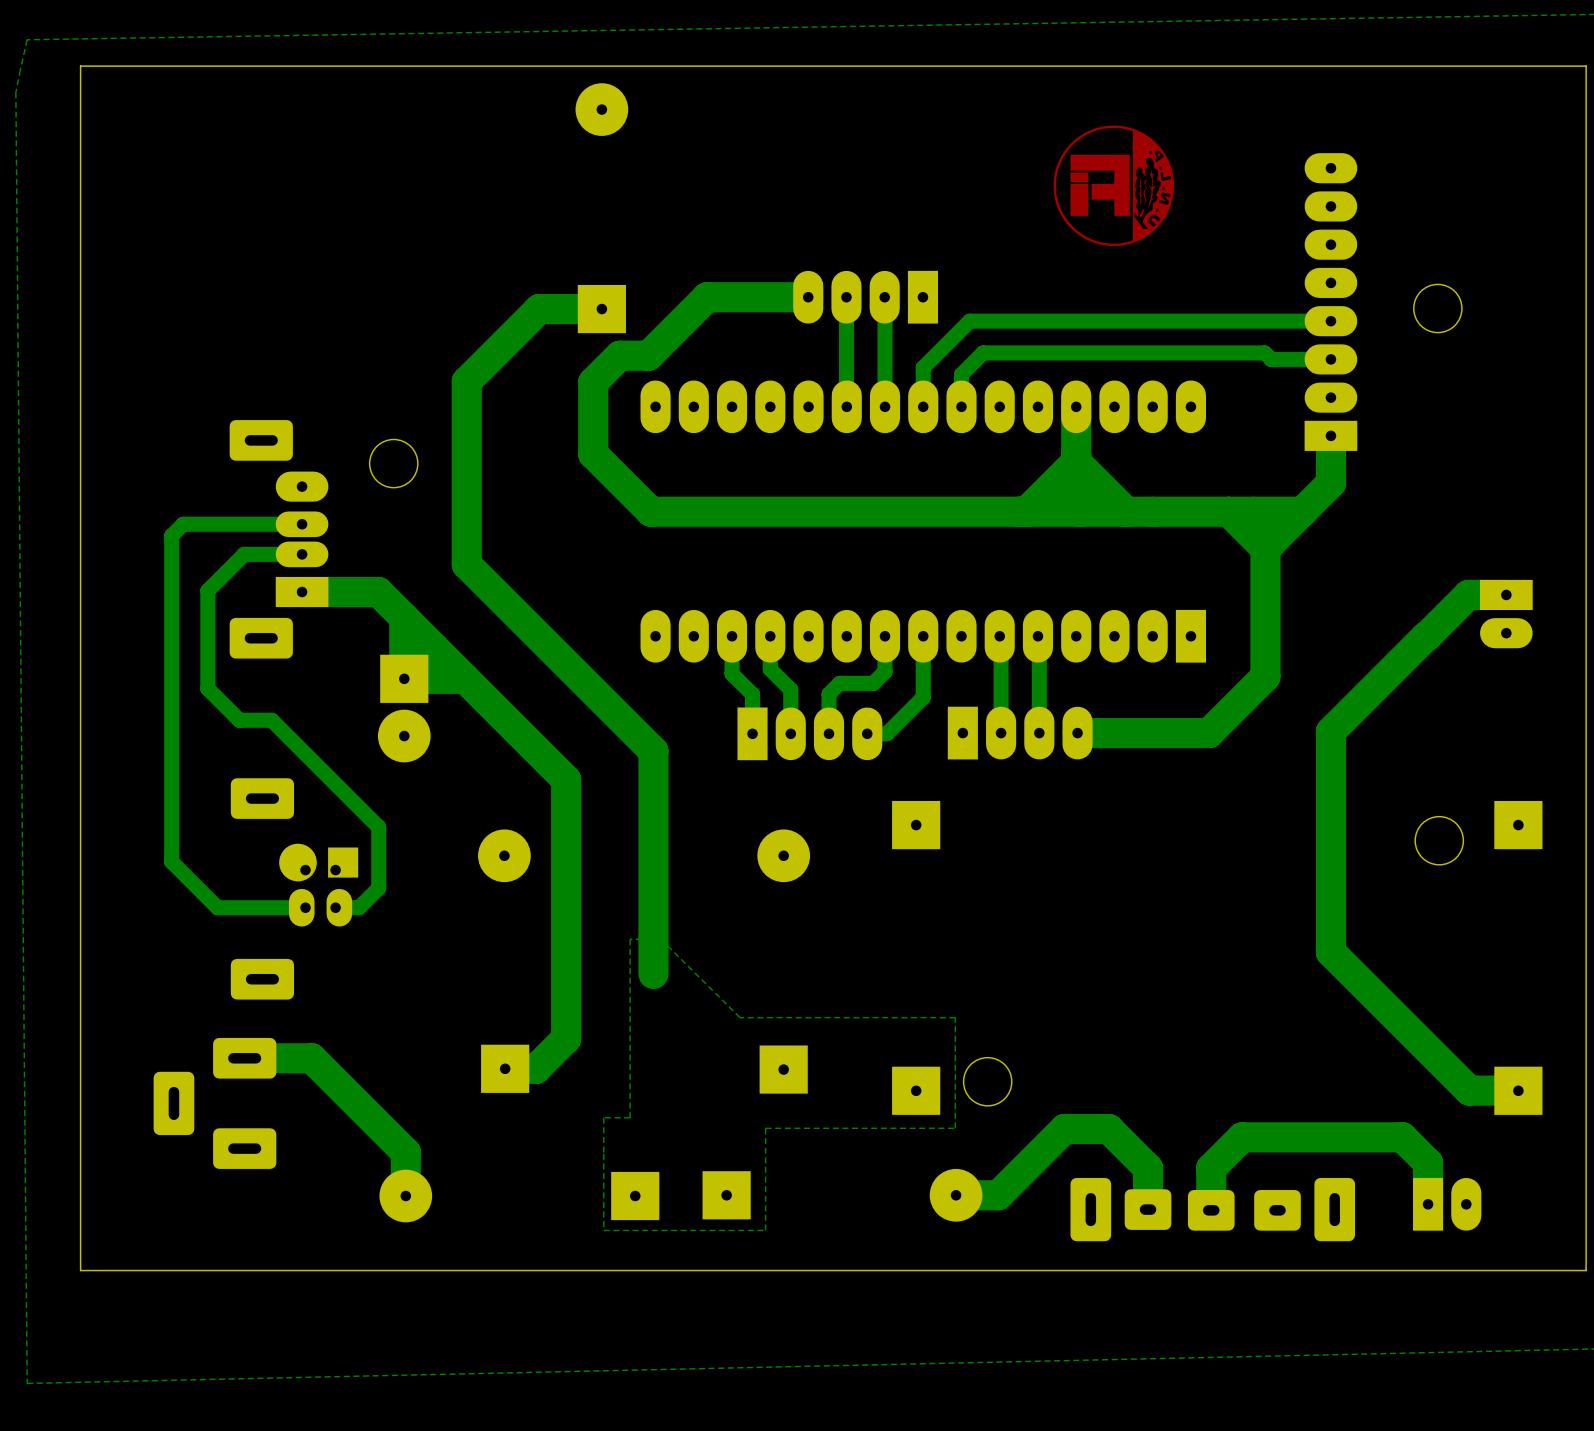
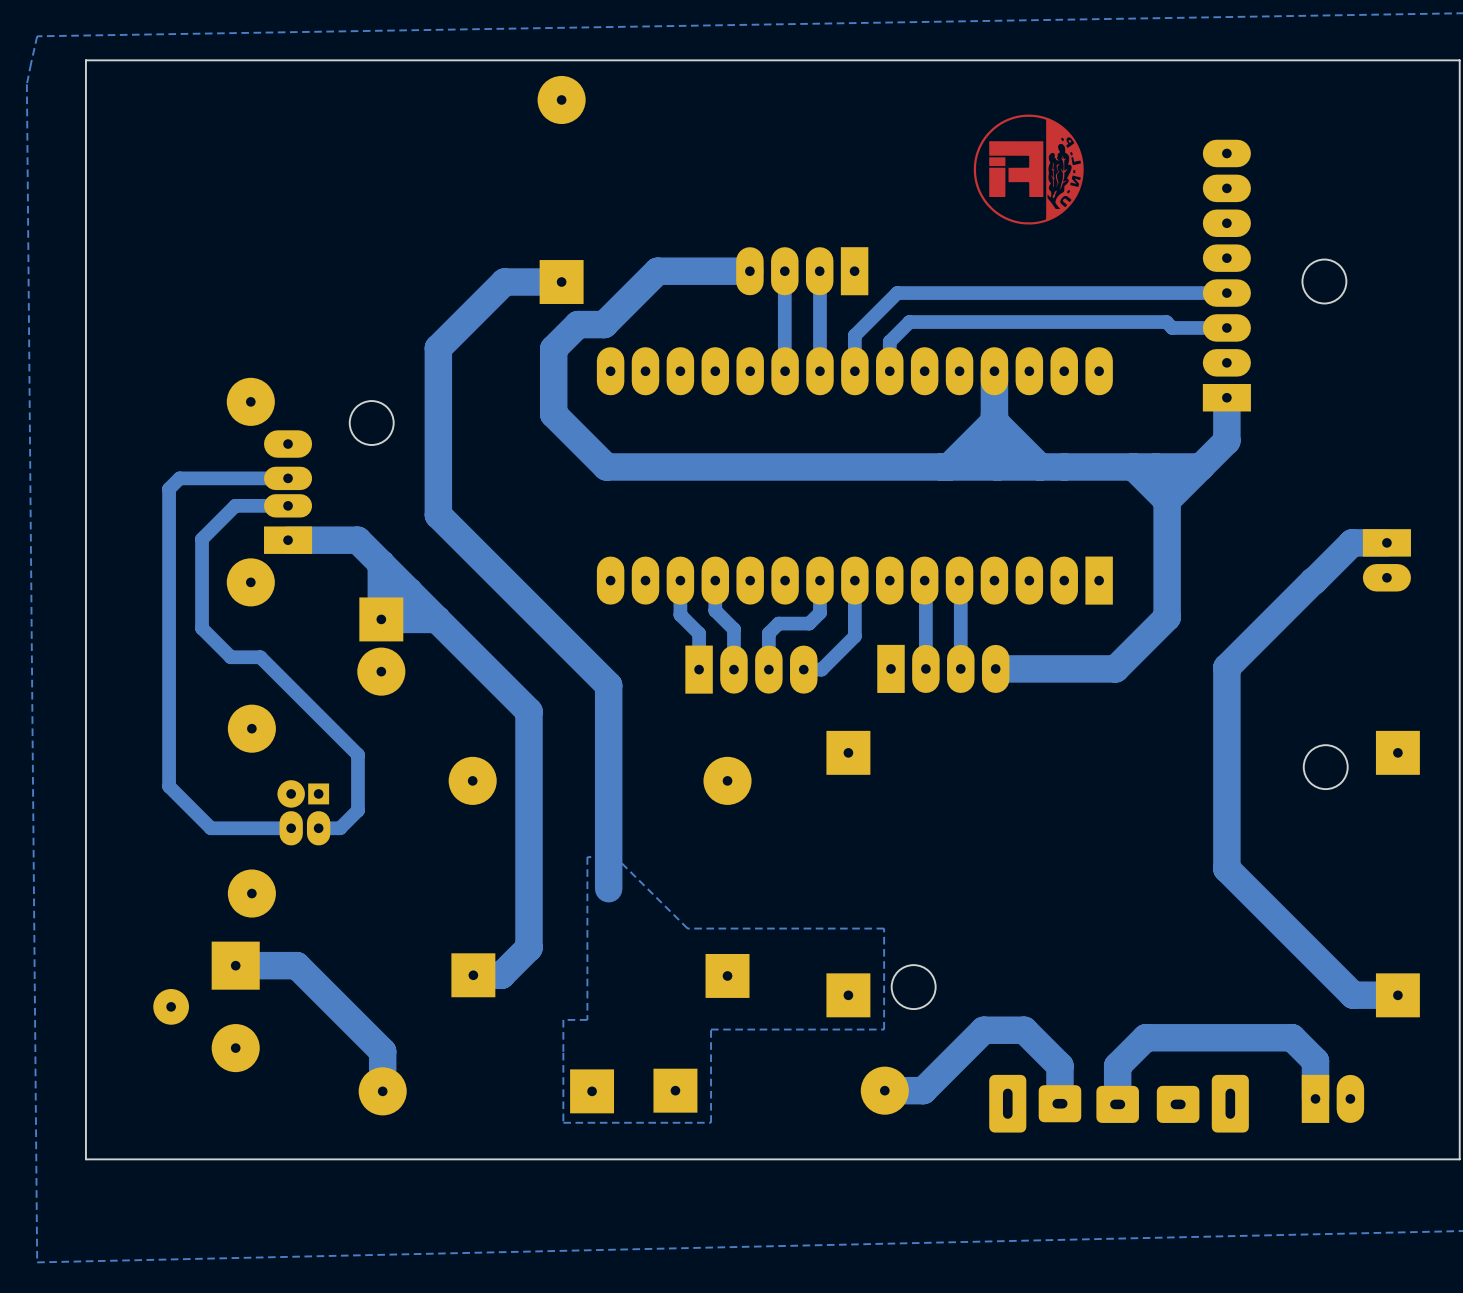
part footprint: [229, 420, 329, 659] -> [226, 377, 313, 607]
part footprint: [230, 778, 359, 1000] -> [227, 704, 331, 918]
part footprint: [153, 1037, 277, 1169] -> [153, 941, 260, 1073]

